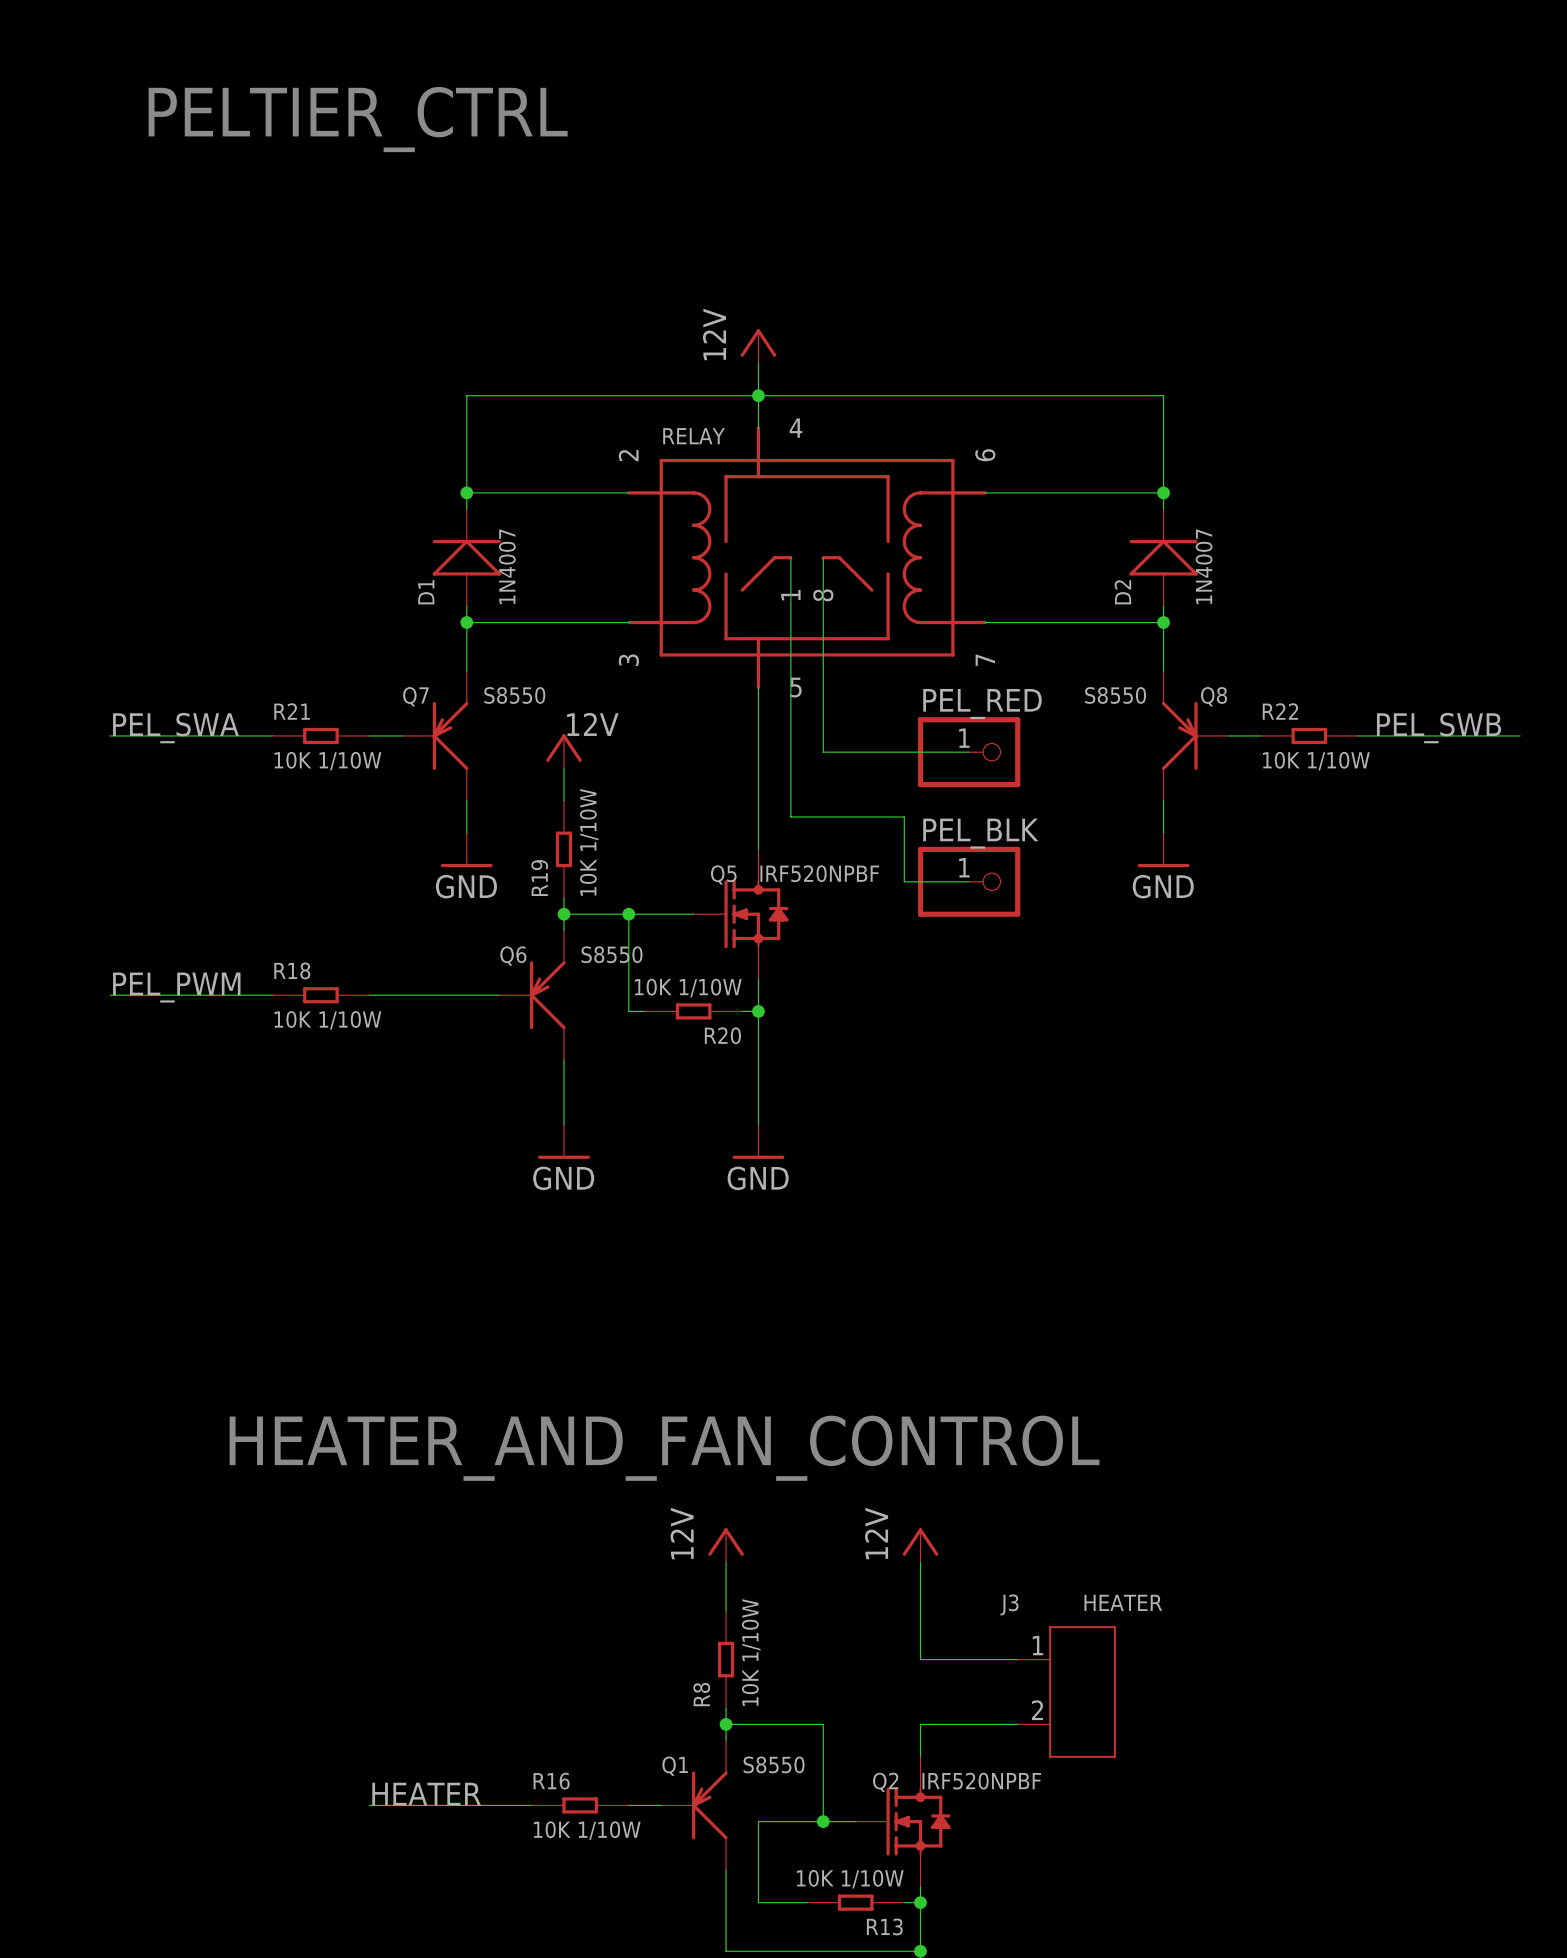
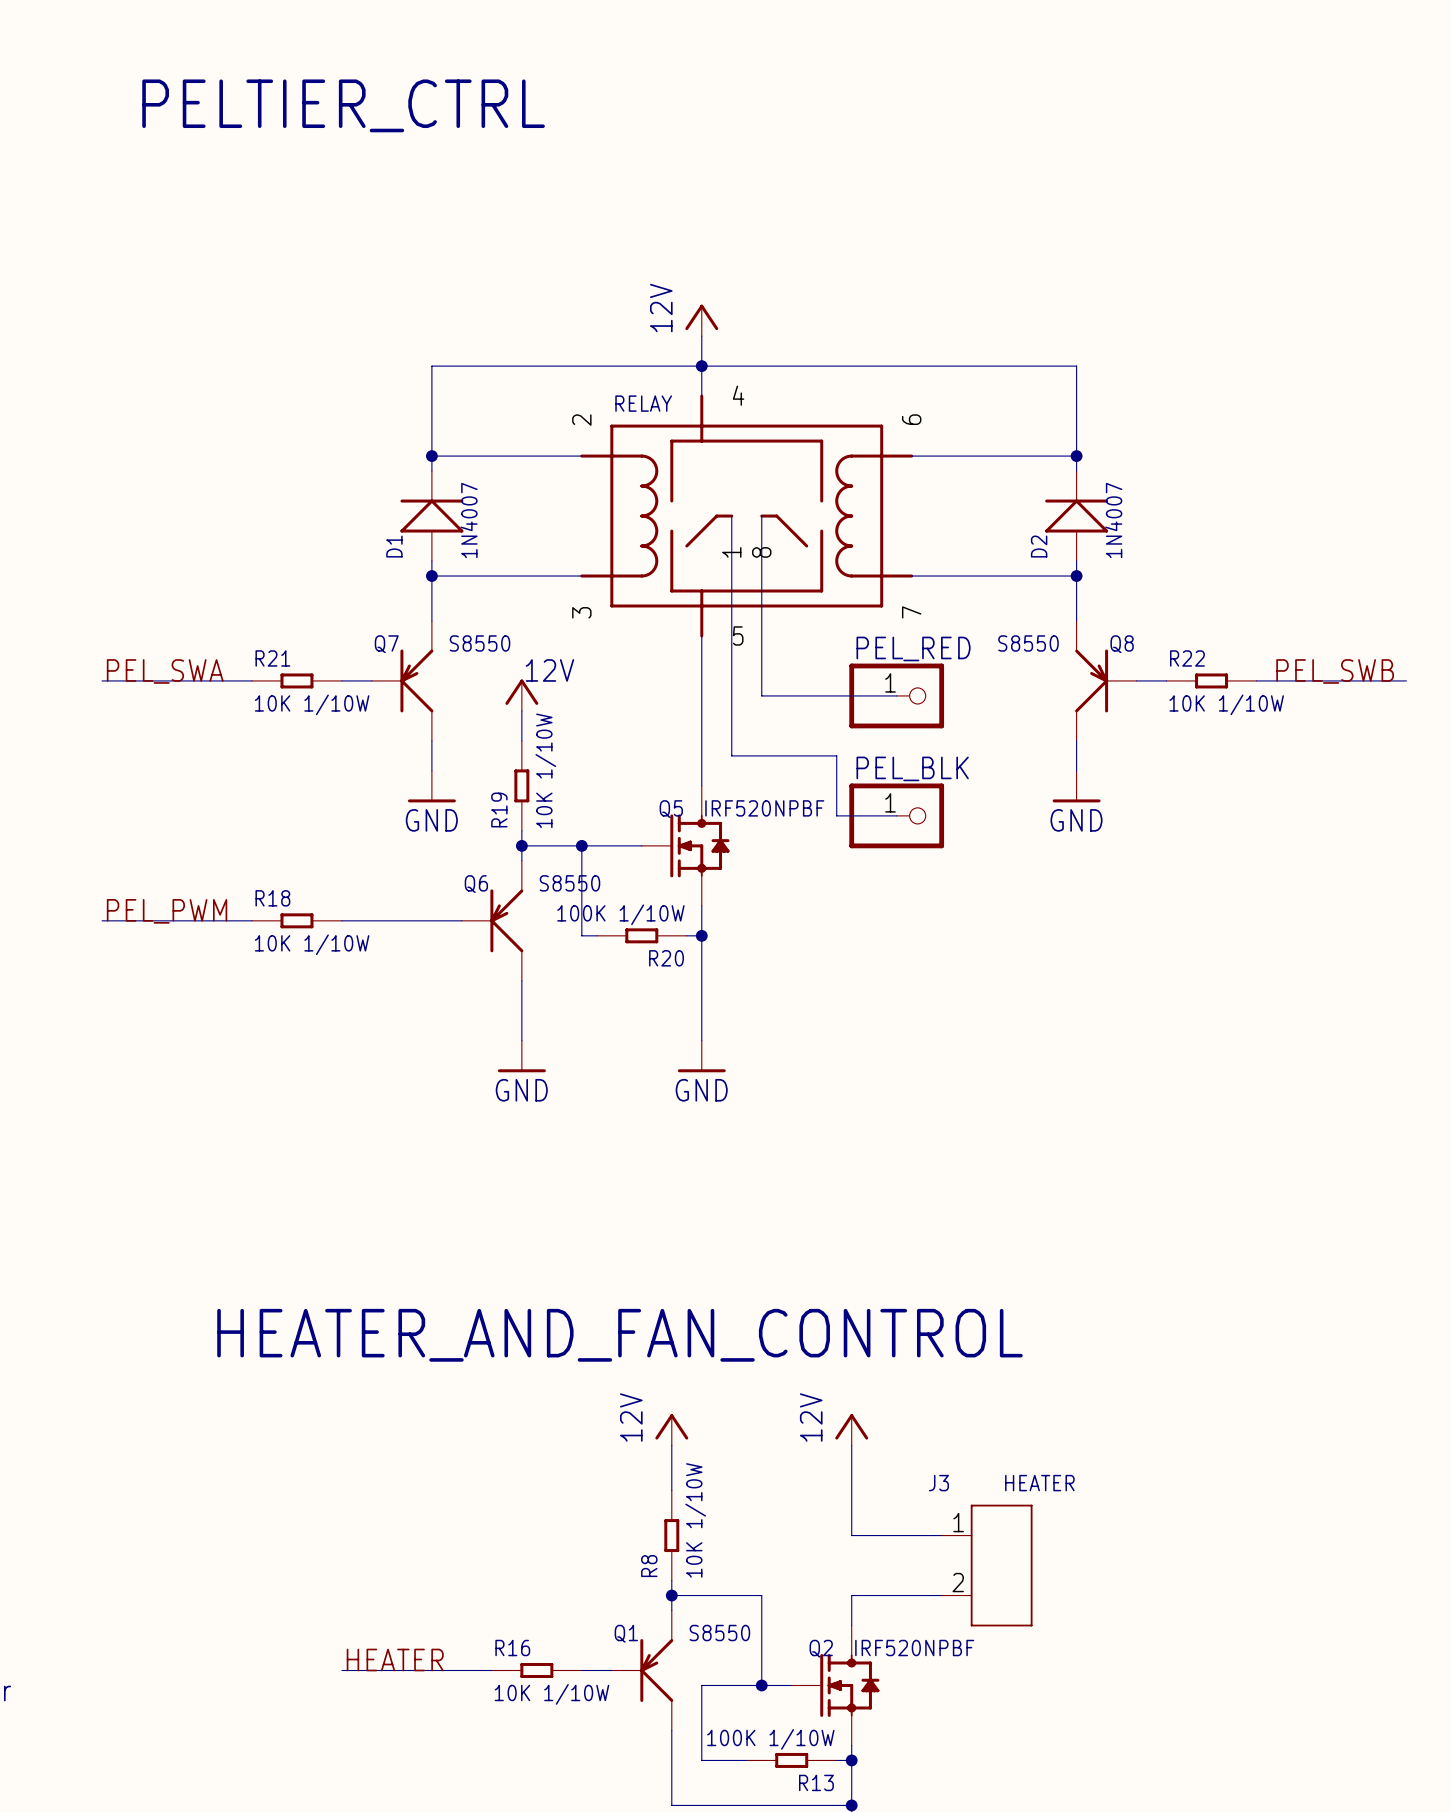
R20 value: 10K 1/10W (688, 988) -> 100K 1/10W (620, 914)
R13 value: 10K 1/10W (850, 1879) -> 100K 1/10W (770, 1739)

